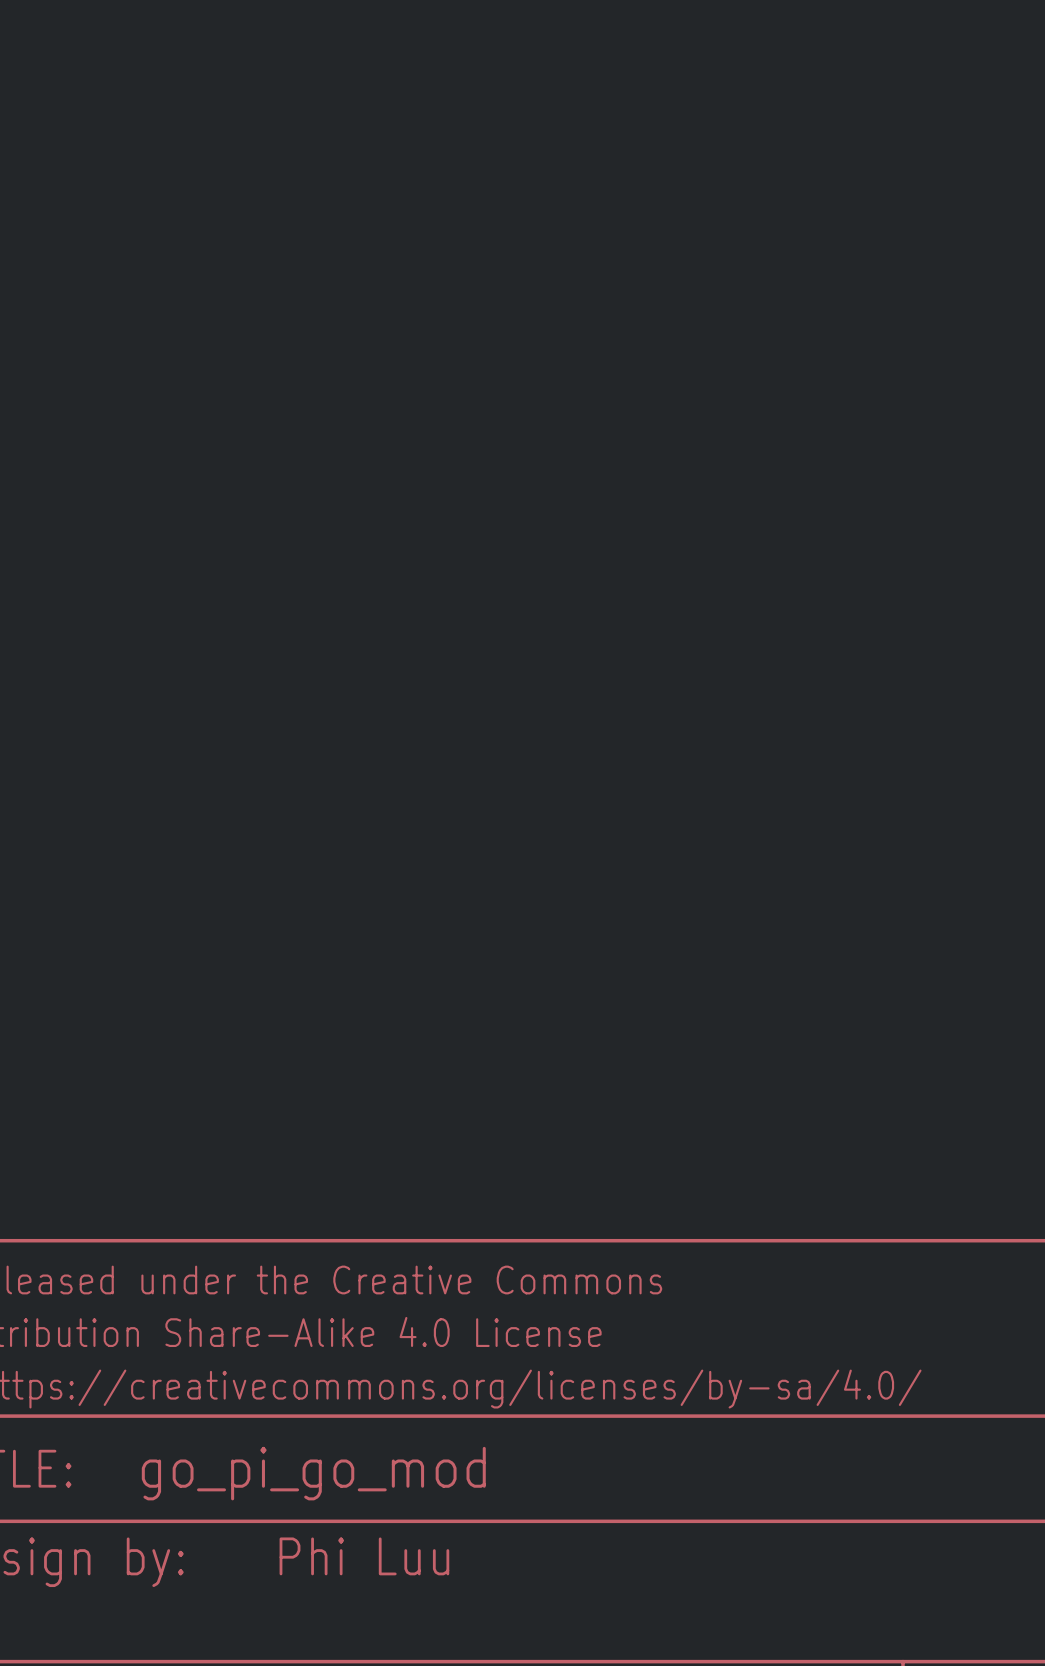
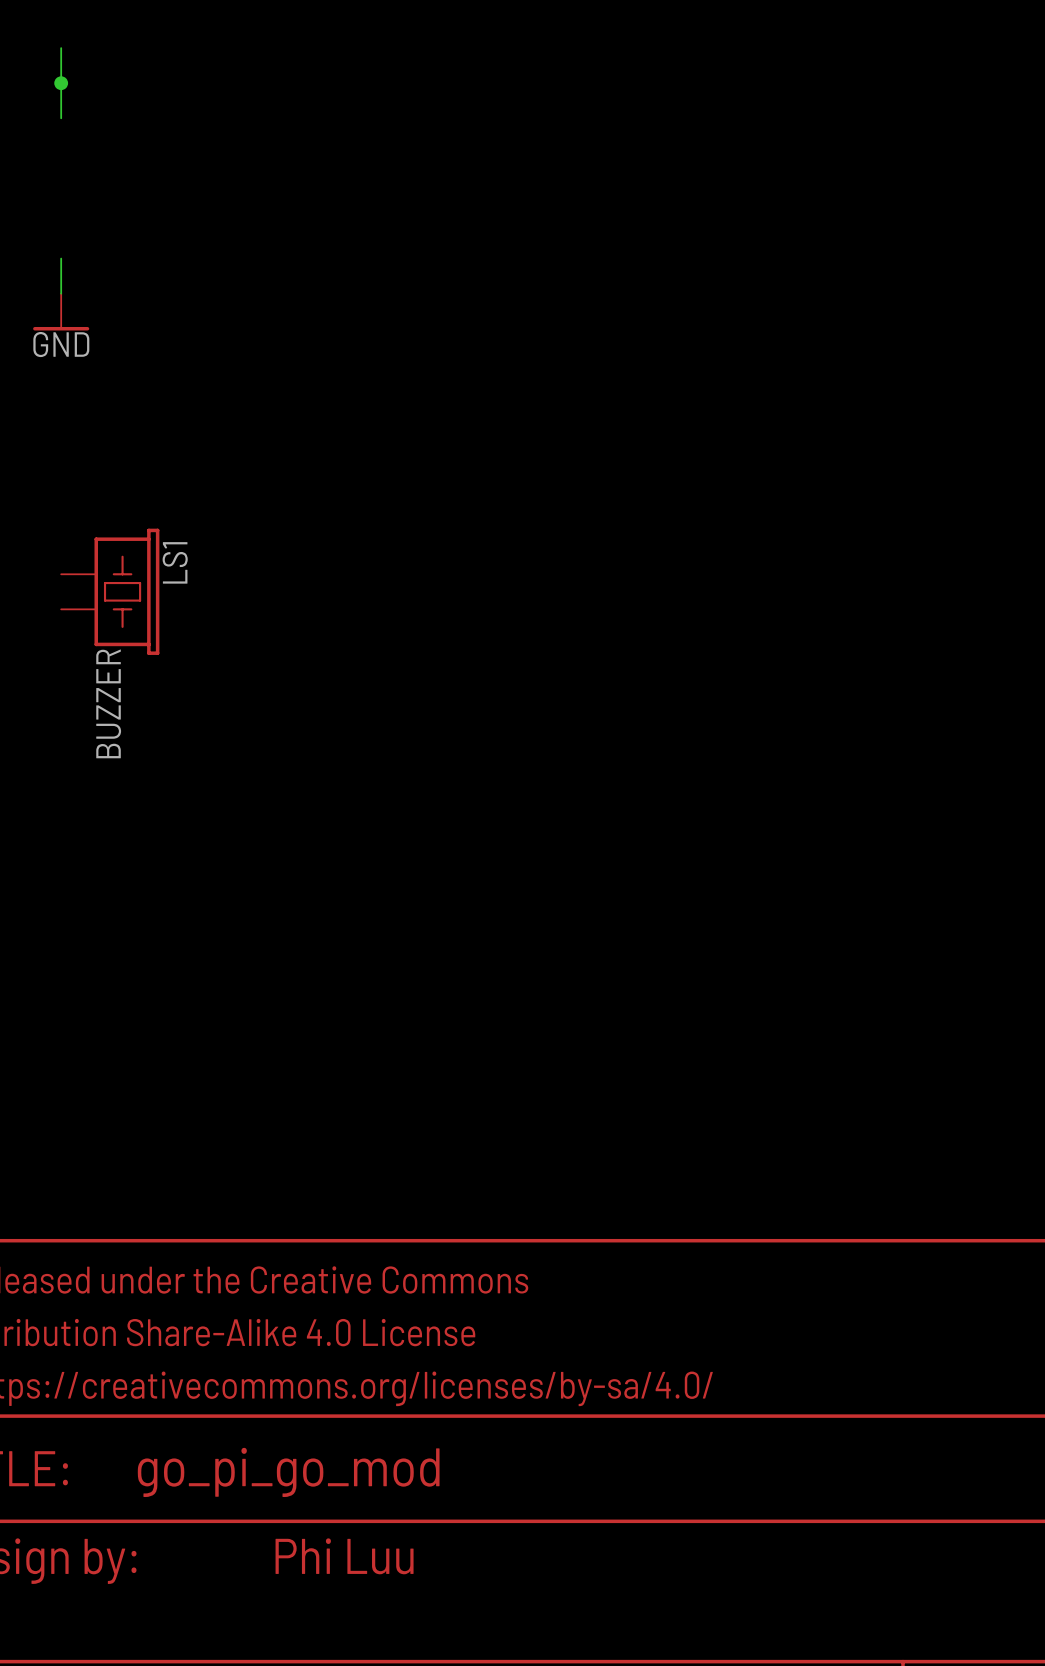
wire: none -> (61, 48) (61, 118)
junction: none -> (61, 83)
wire: none -> (61, 258) (61, 293)
power symbol: none -> GND (61, 312)
LS1: none -> BUZZER (110, 591)

